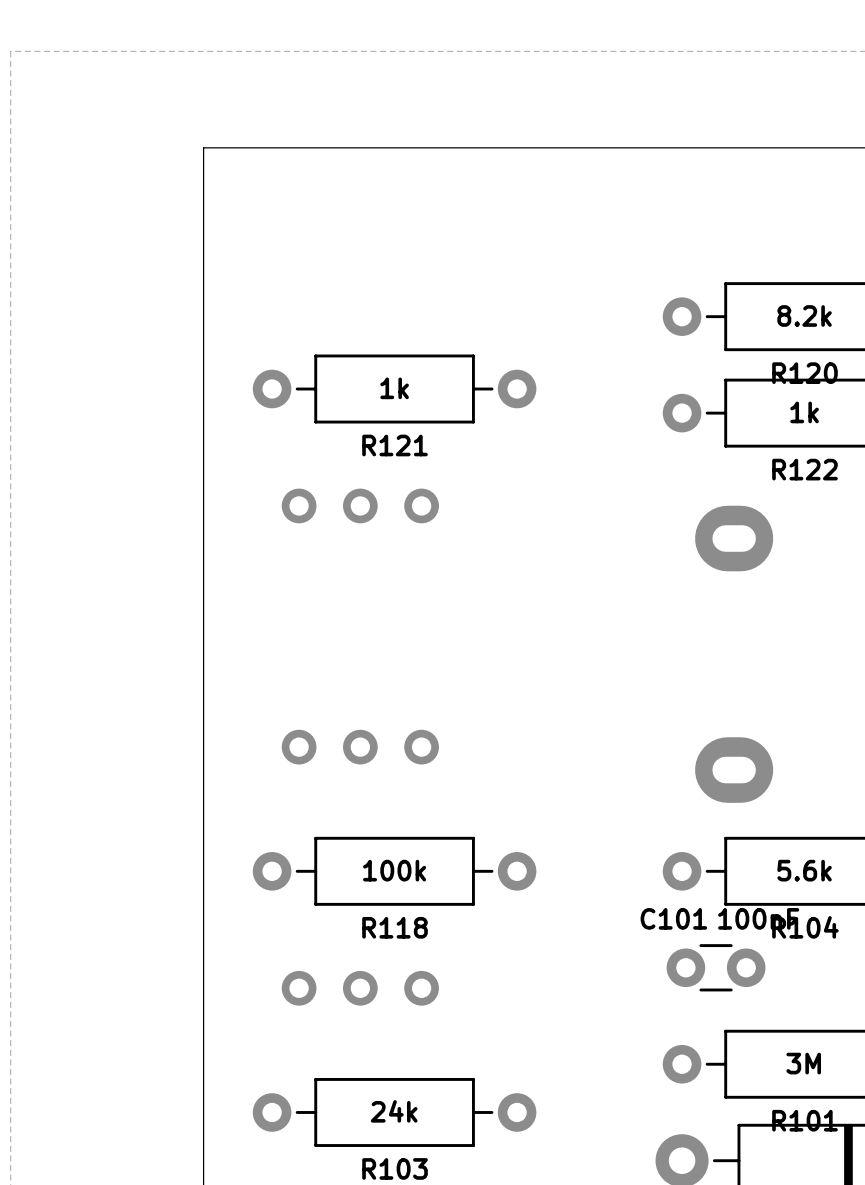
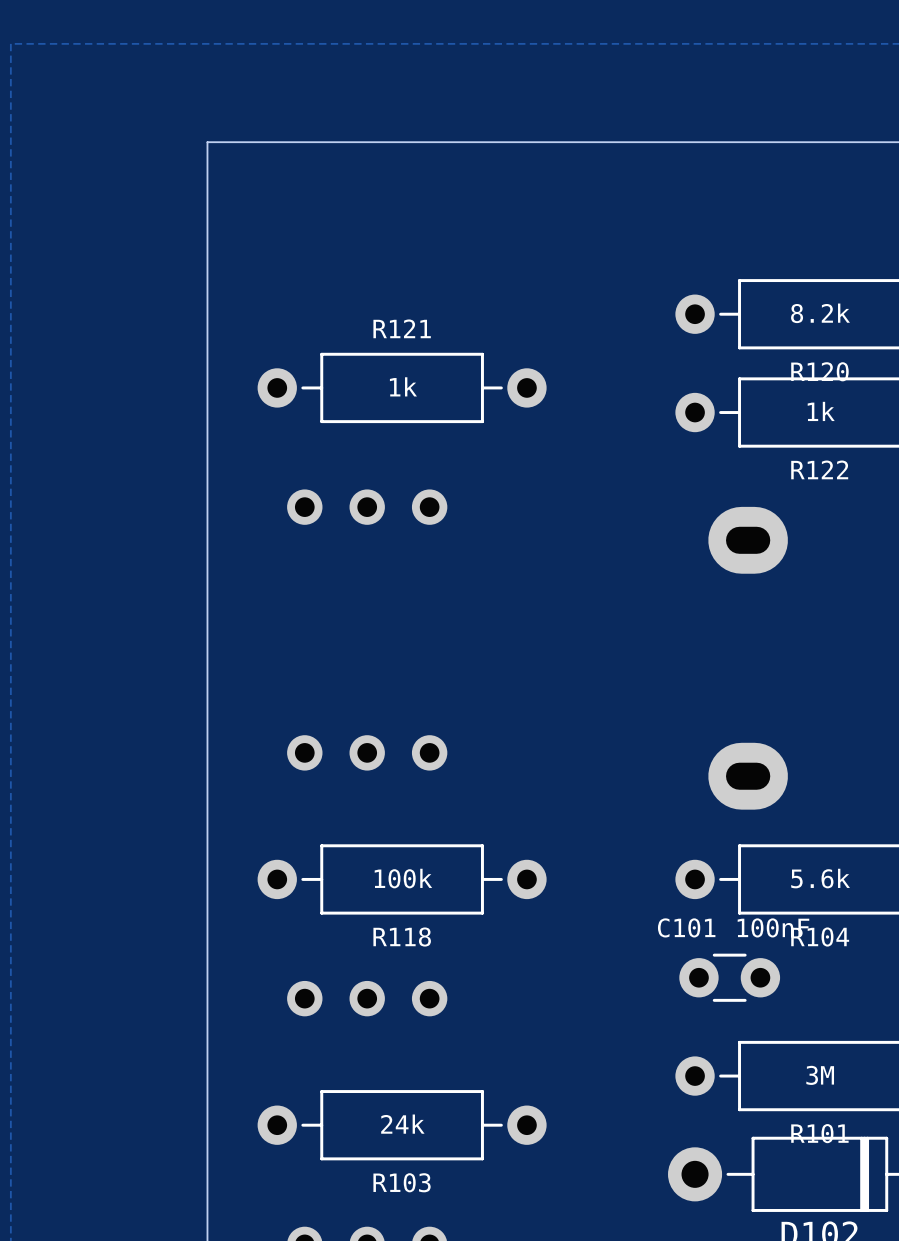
R121 name position: R121 (395, 445) -> R121 (402, 328)

